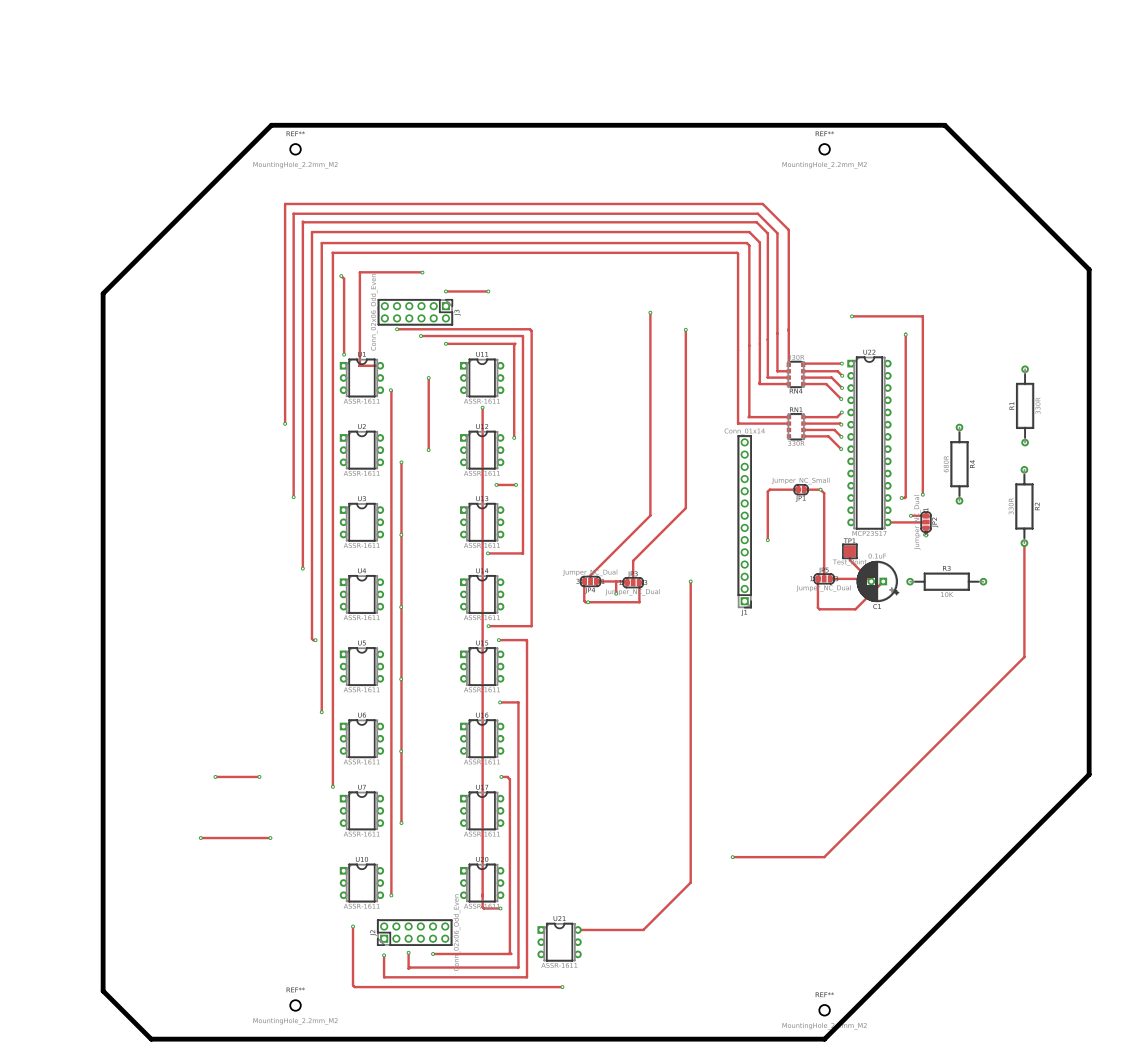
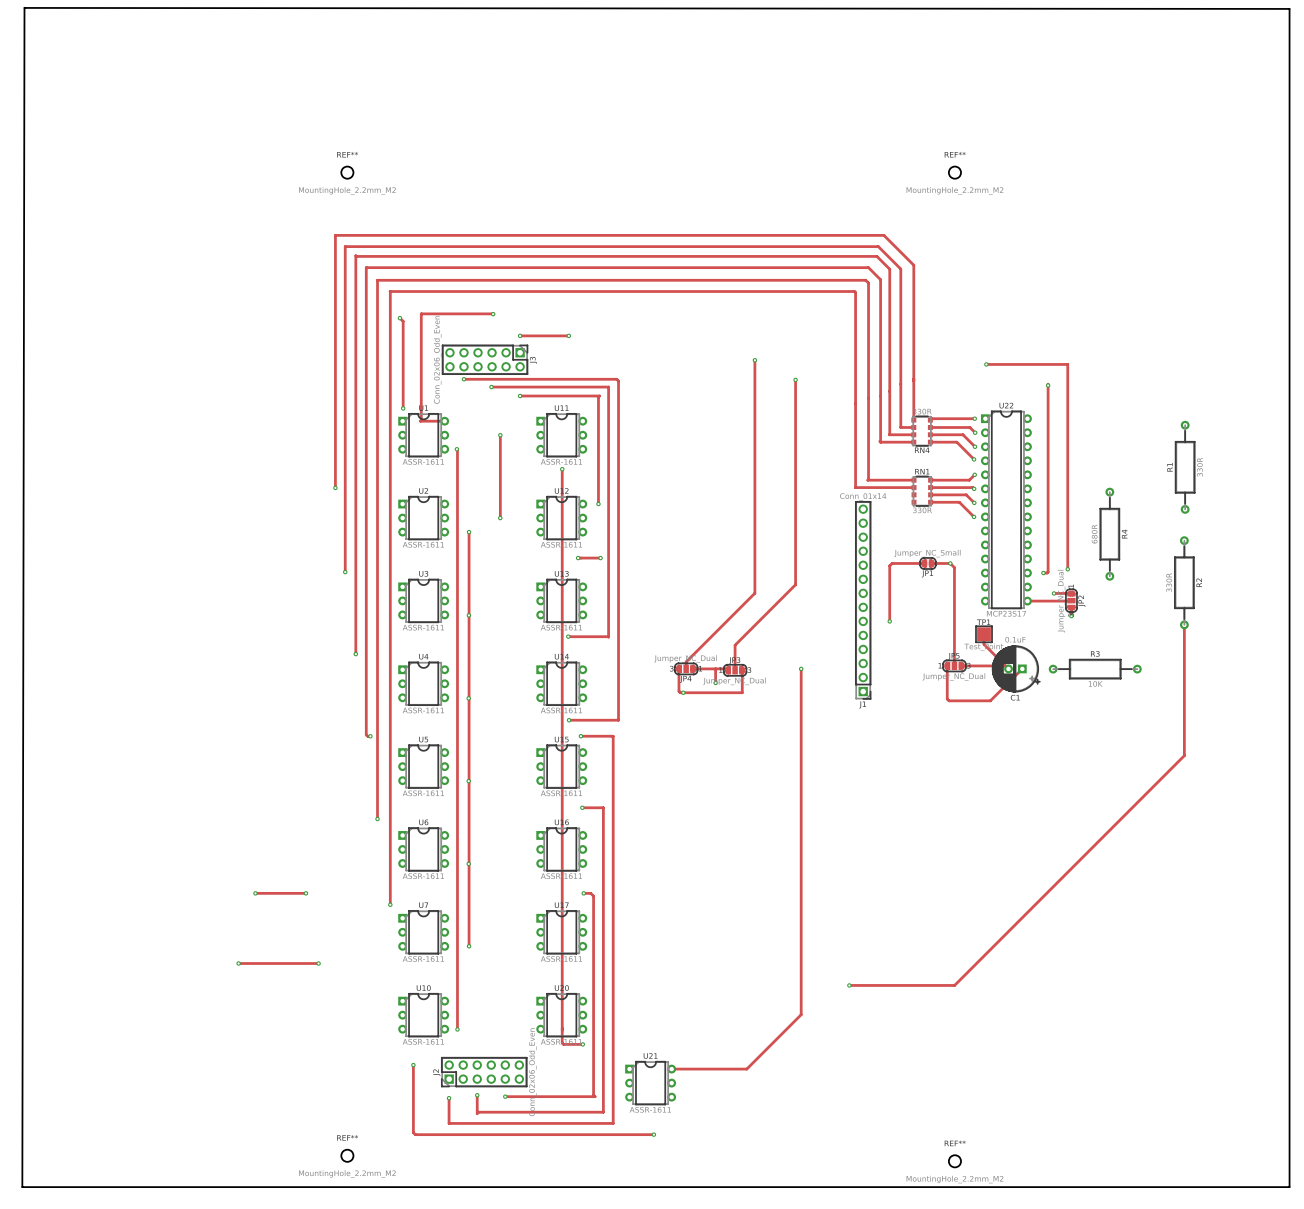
board edge: none -> (24, 7) (22, 1187) (1289, 1187) (1289, 8) (24, 7)
board edge: (271, 125) (103, 293) (103, 991) (151, 1039) (824, 1039) (1089, 774) (1089, 269) (944, 125) (271, 125) -> none

